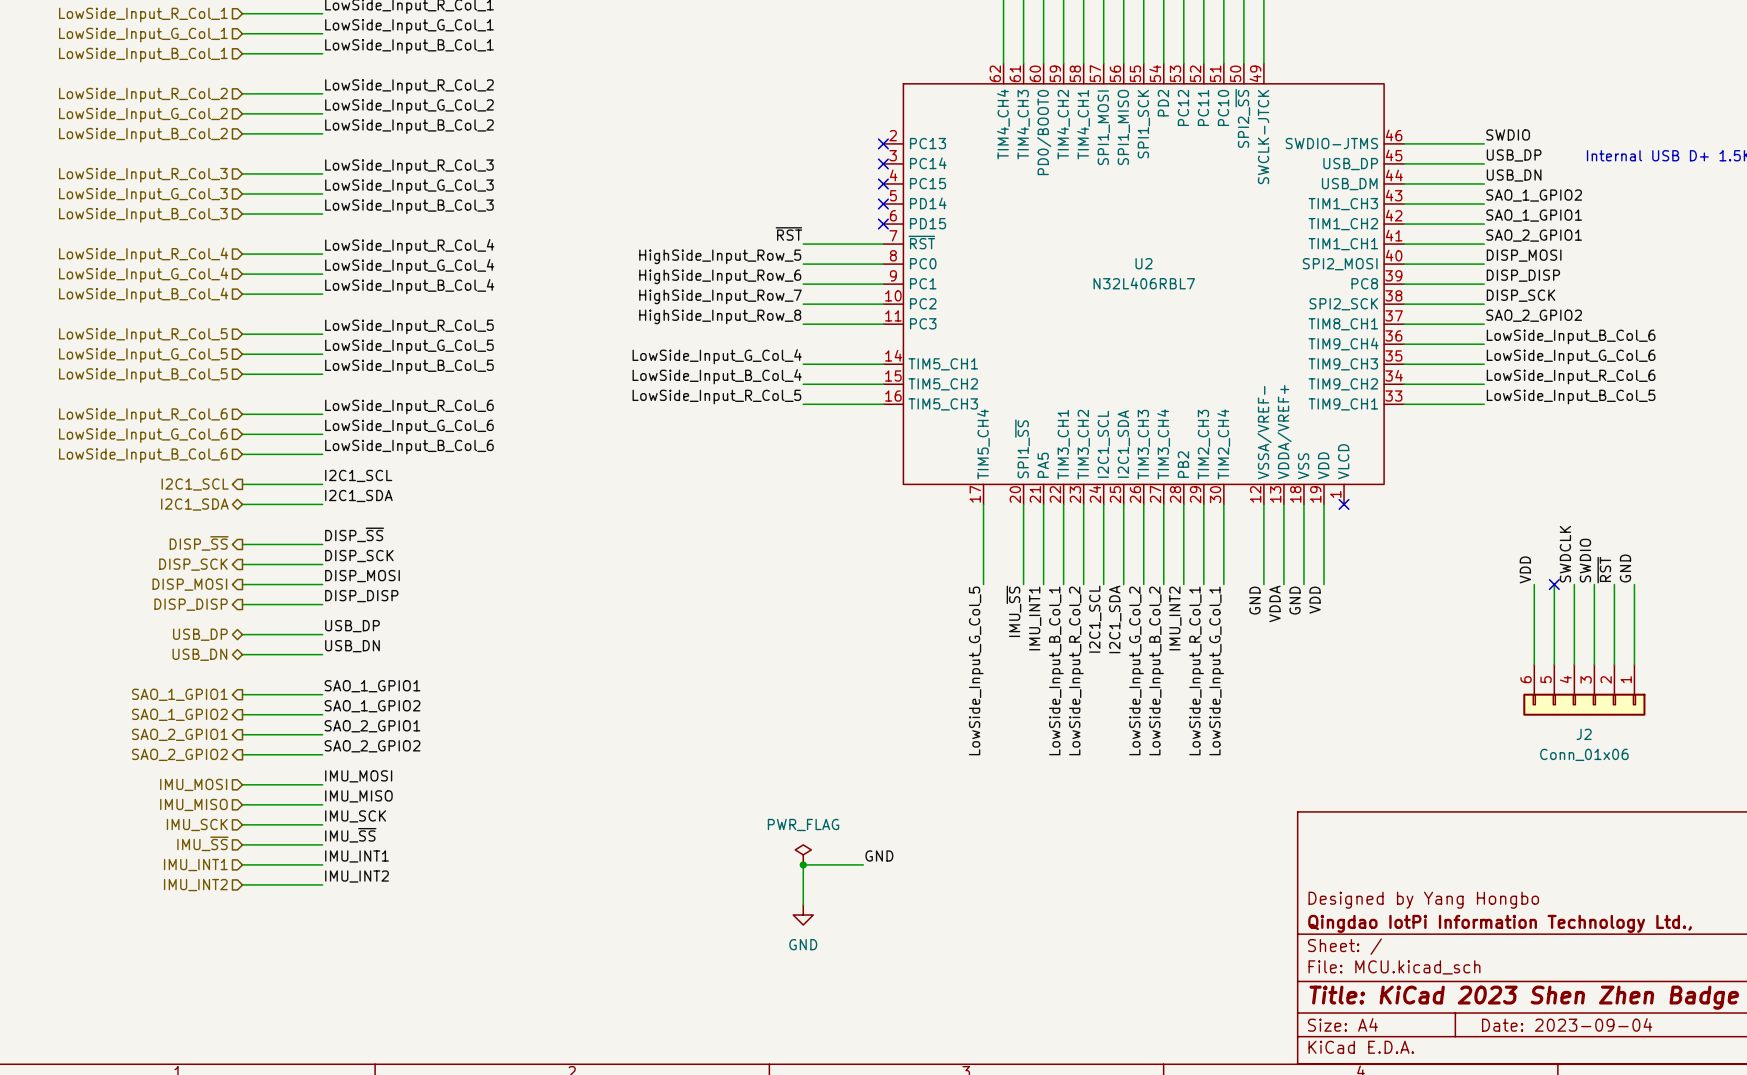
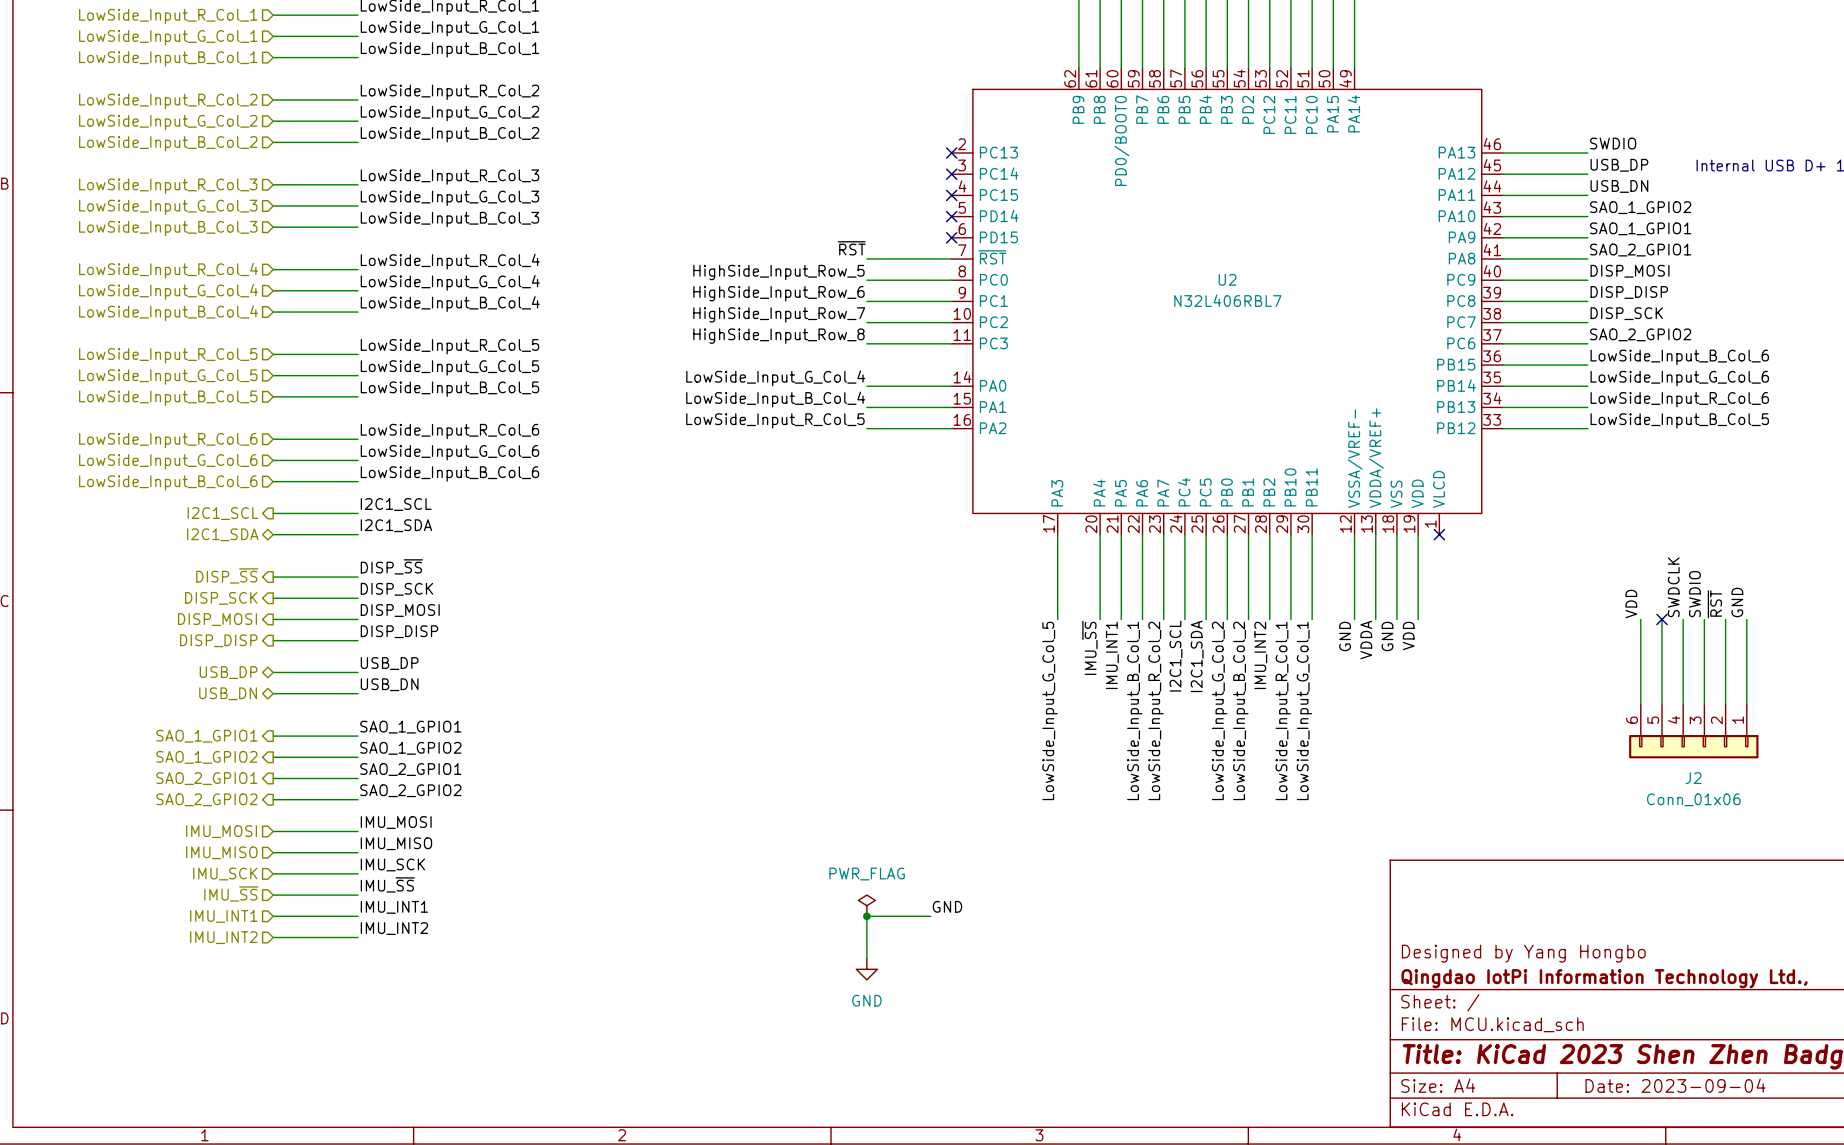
U2 symbol: [883, 63, 1405, 505] -> [951, 68, 1503, 535]

